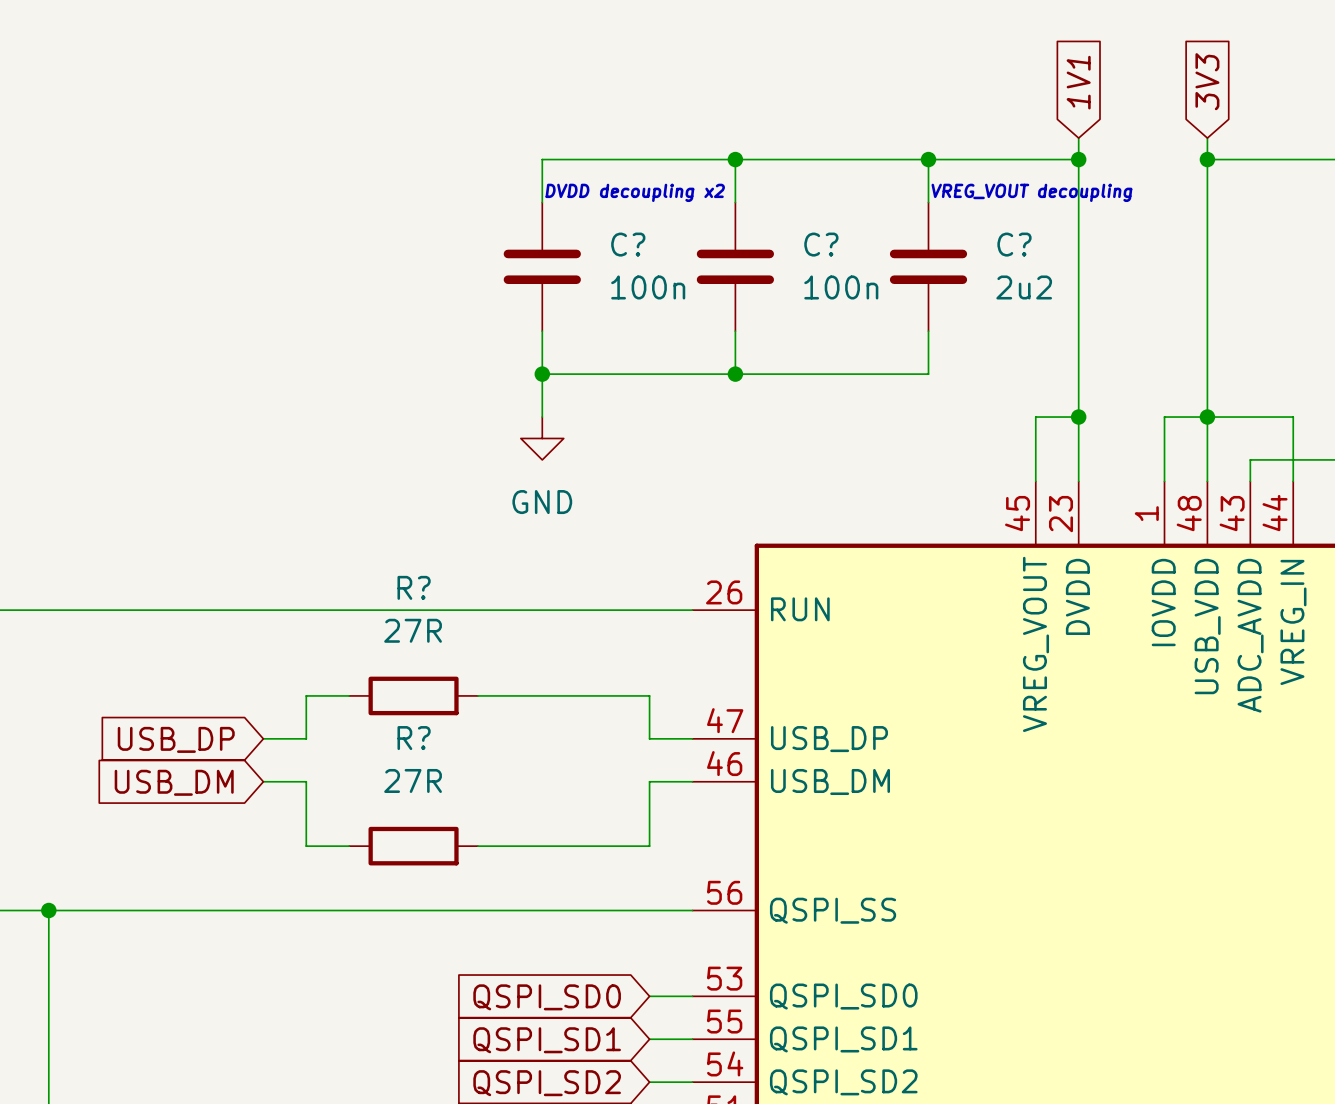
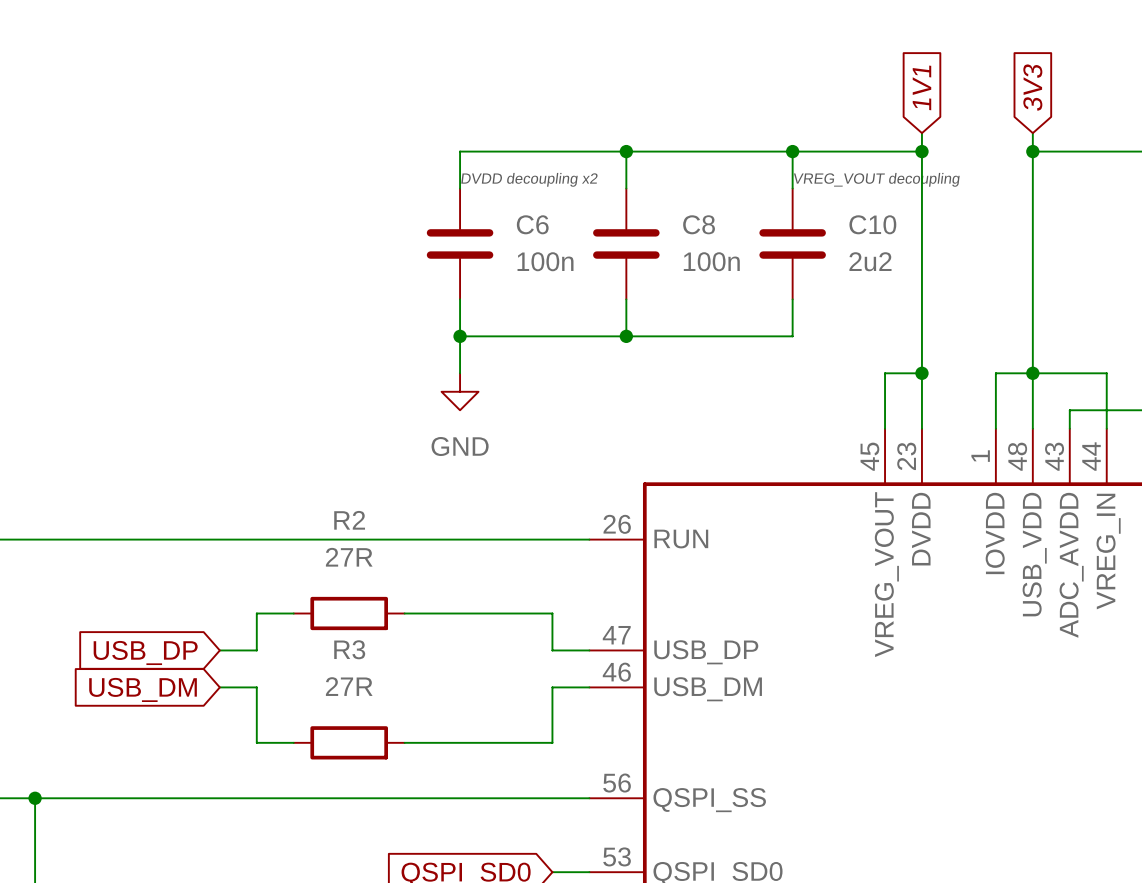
C? name: C? (628, 244) -> C6 (532, 224)
C? name: C? (821, 244) -> C8 (699, 224)
C? name: C? (1014, 244) -> C10 (872, 224)
R? name: R? (414, 587) -> R2 (349, 520)
R? name: R? (414, 738) -> R3 (349, 649)

